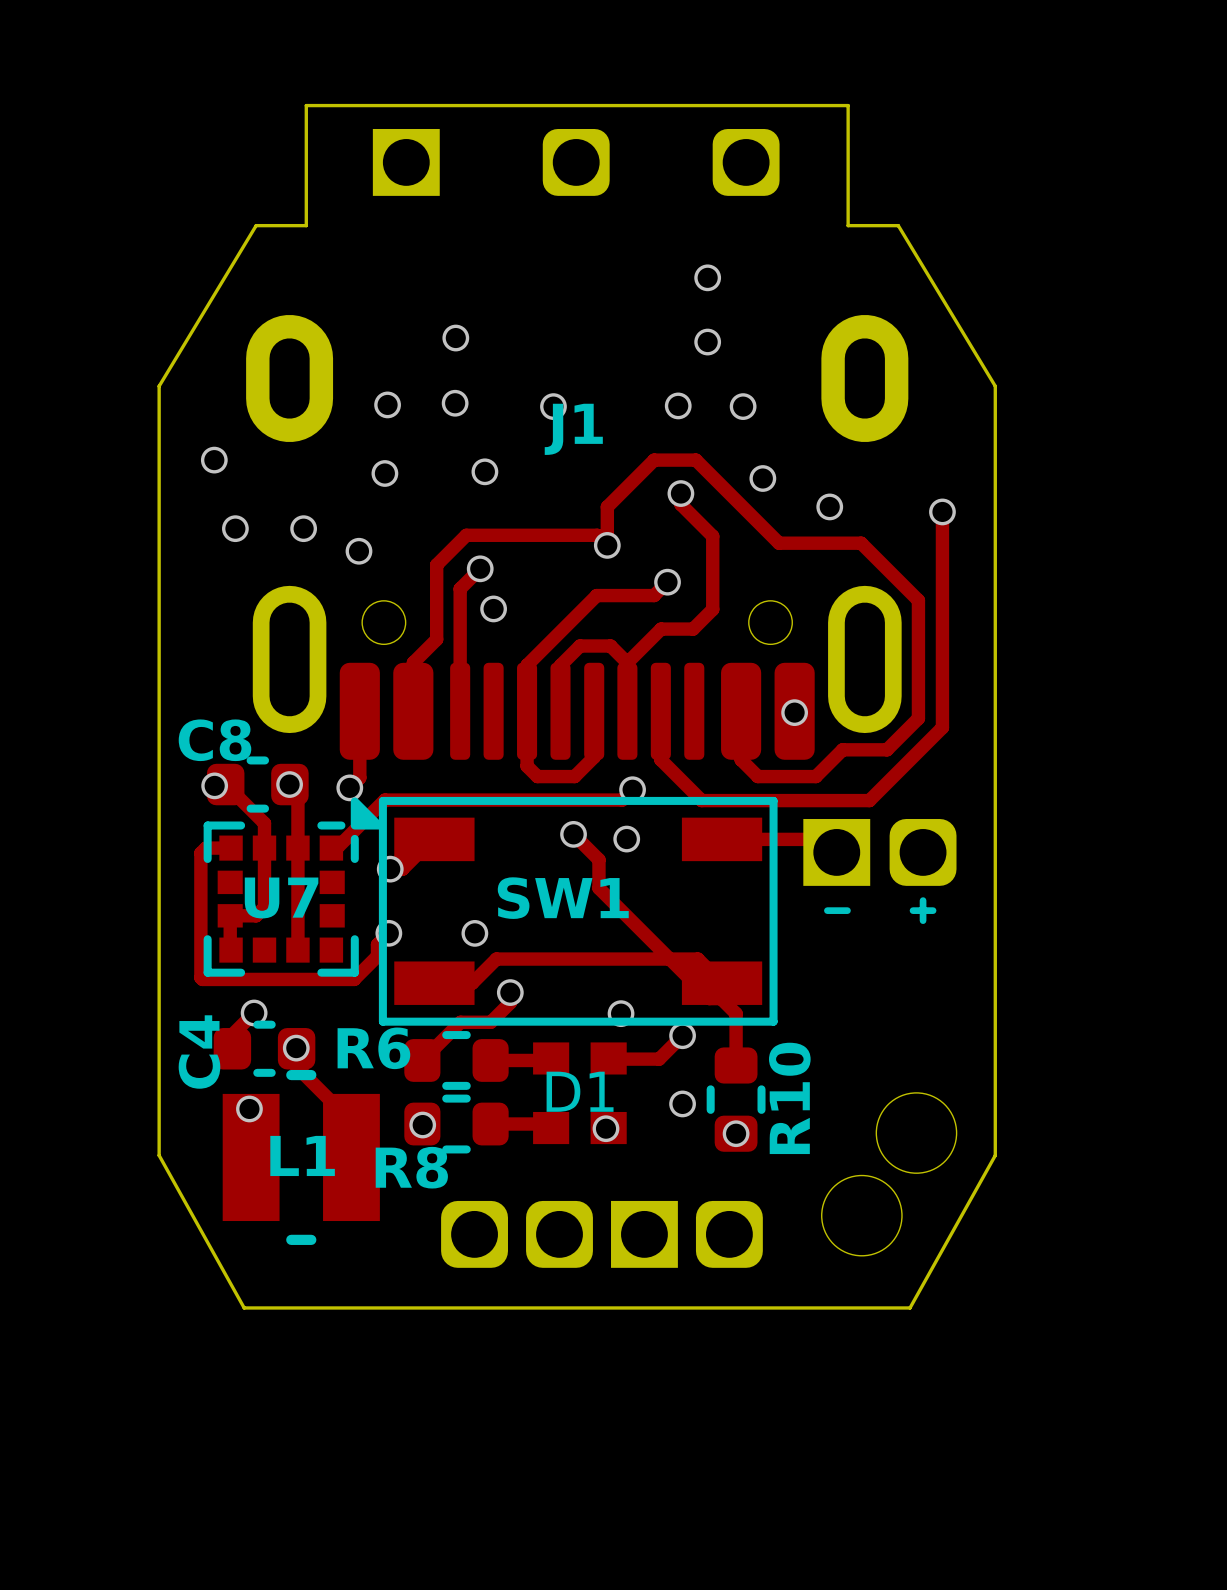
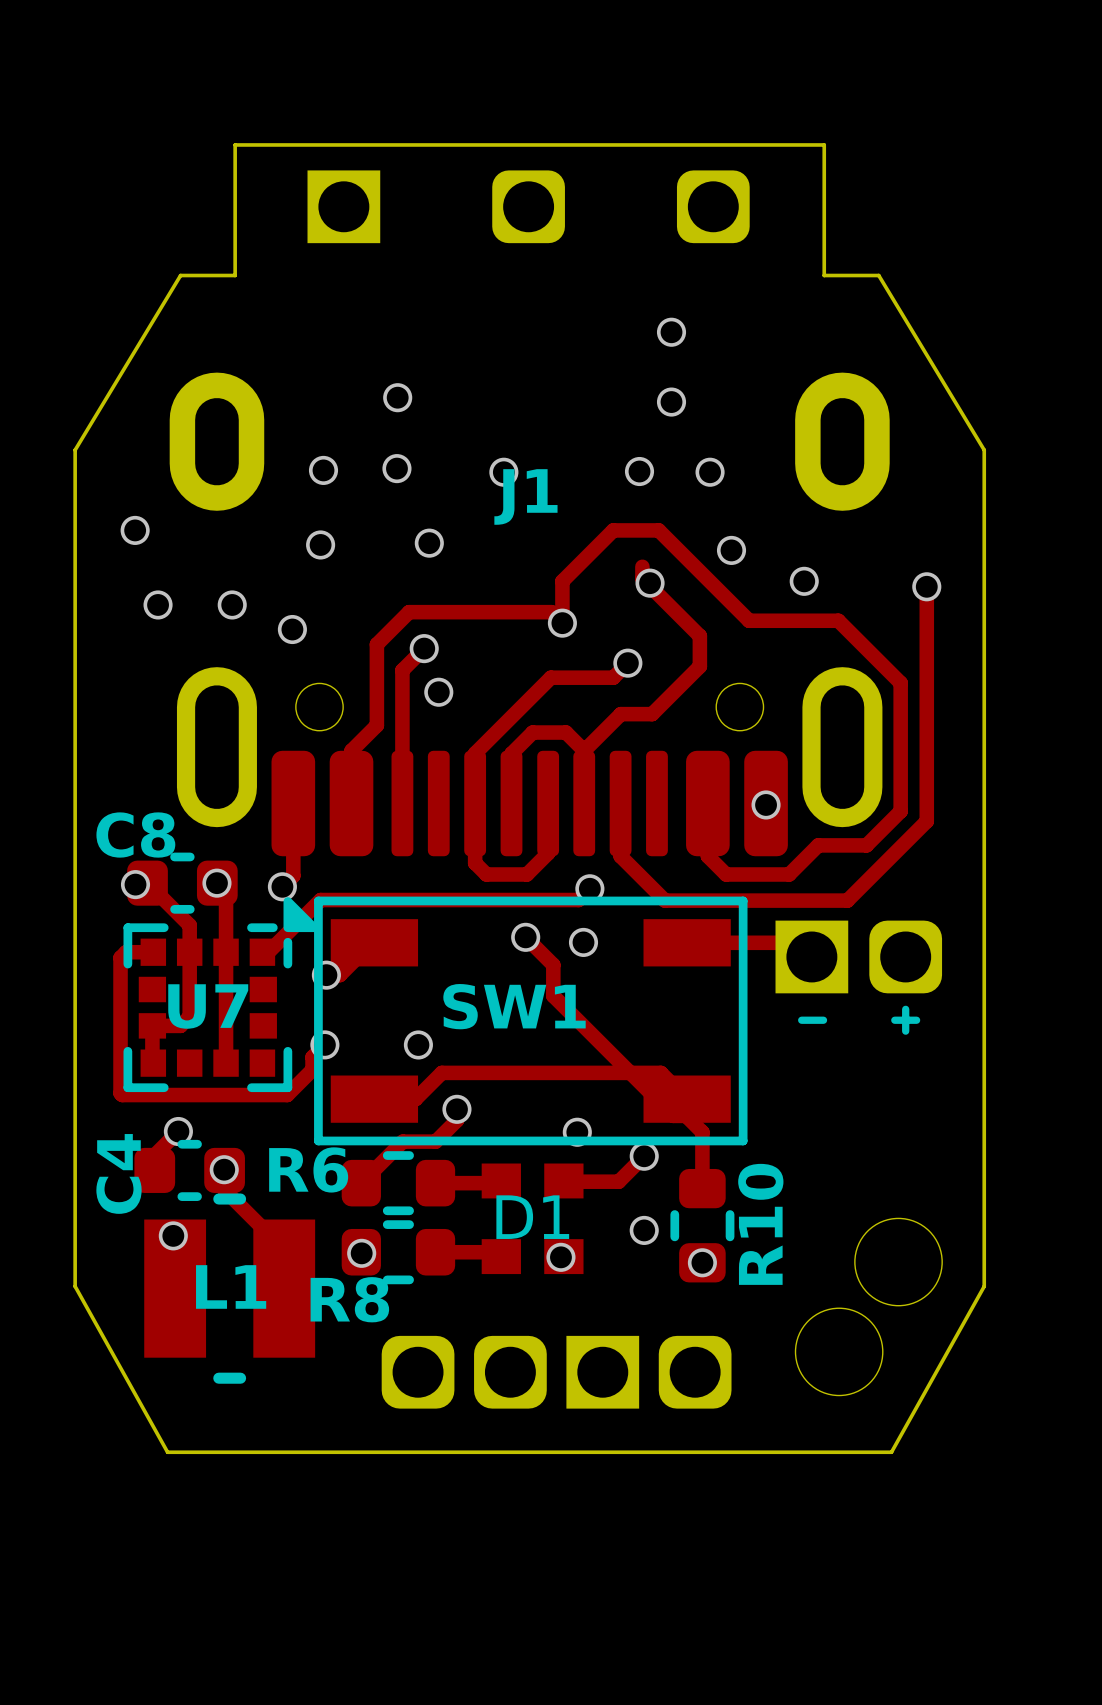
via position: (680, 493) -> (650, 583)
track: (712, 536) (712, 609) (693, 629) (689, 629) -> (677, 613) (699, 636) (699, 666) (652, 714)

